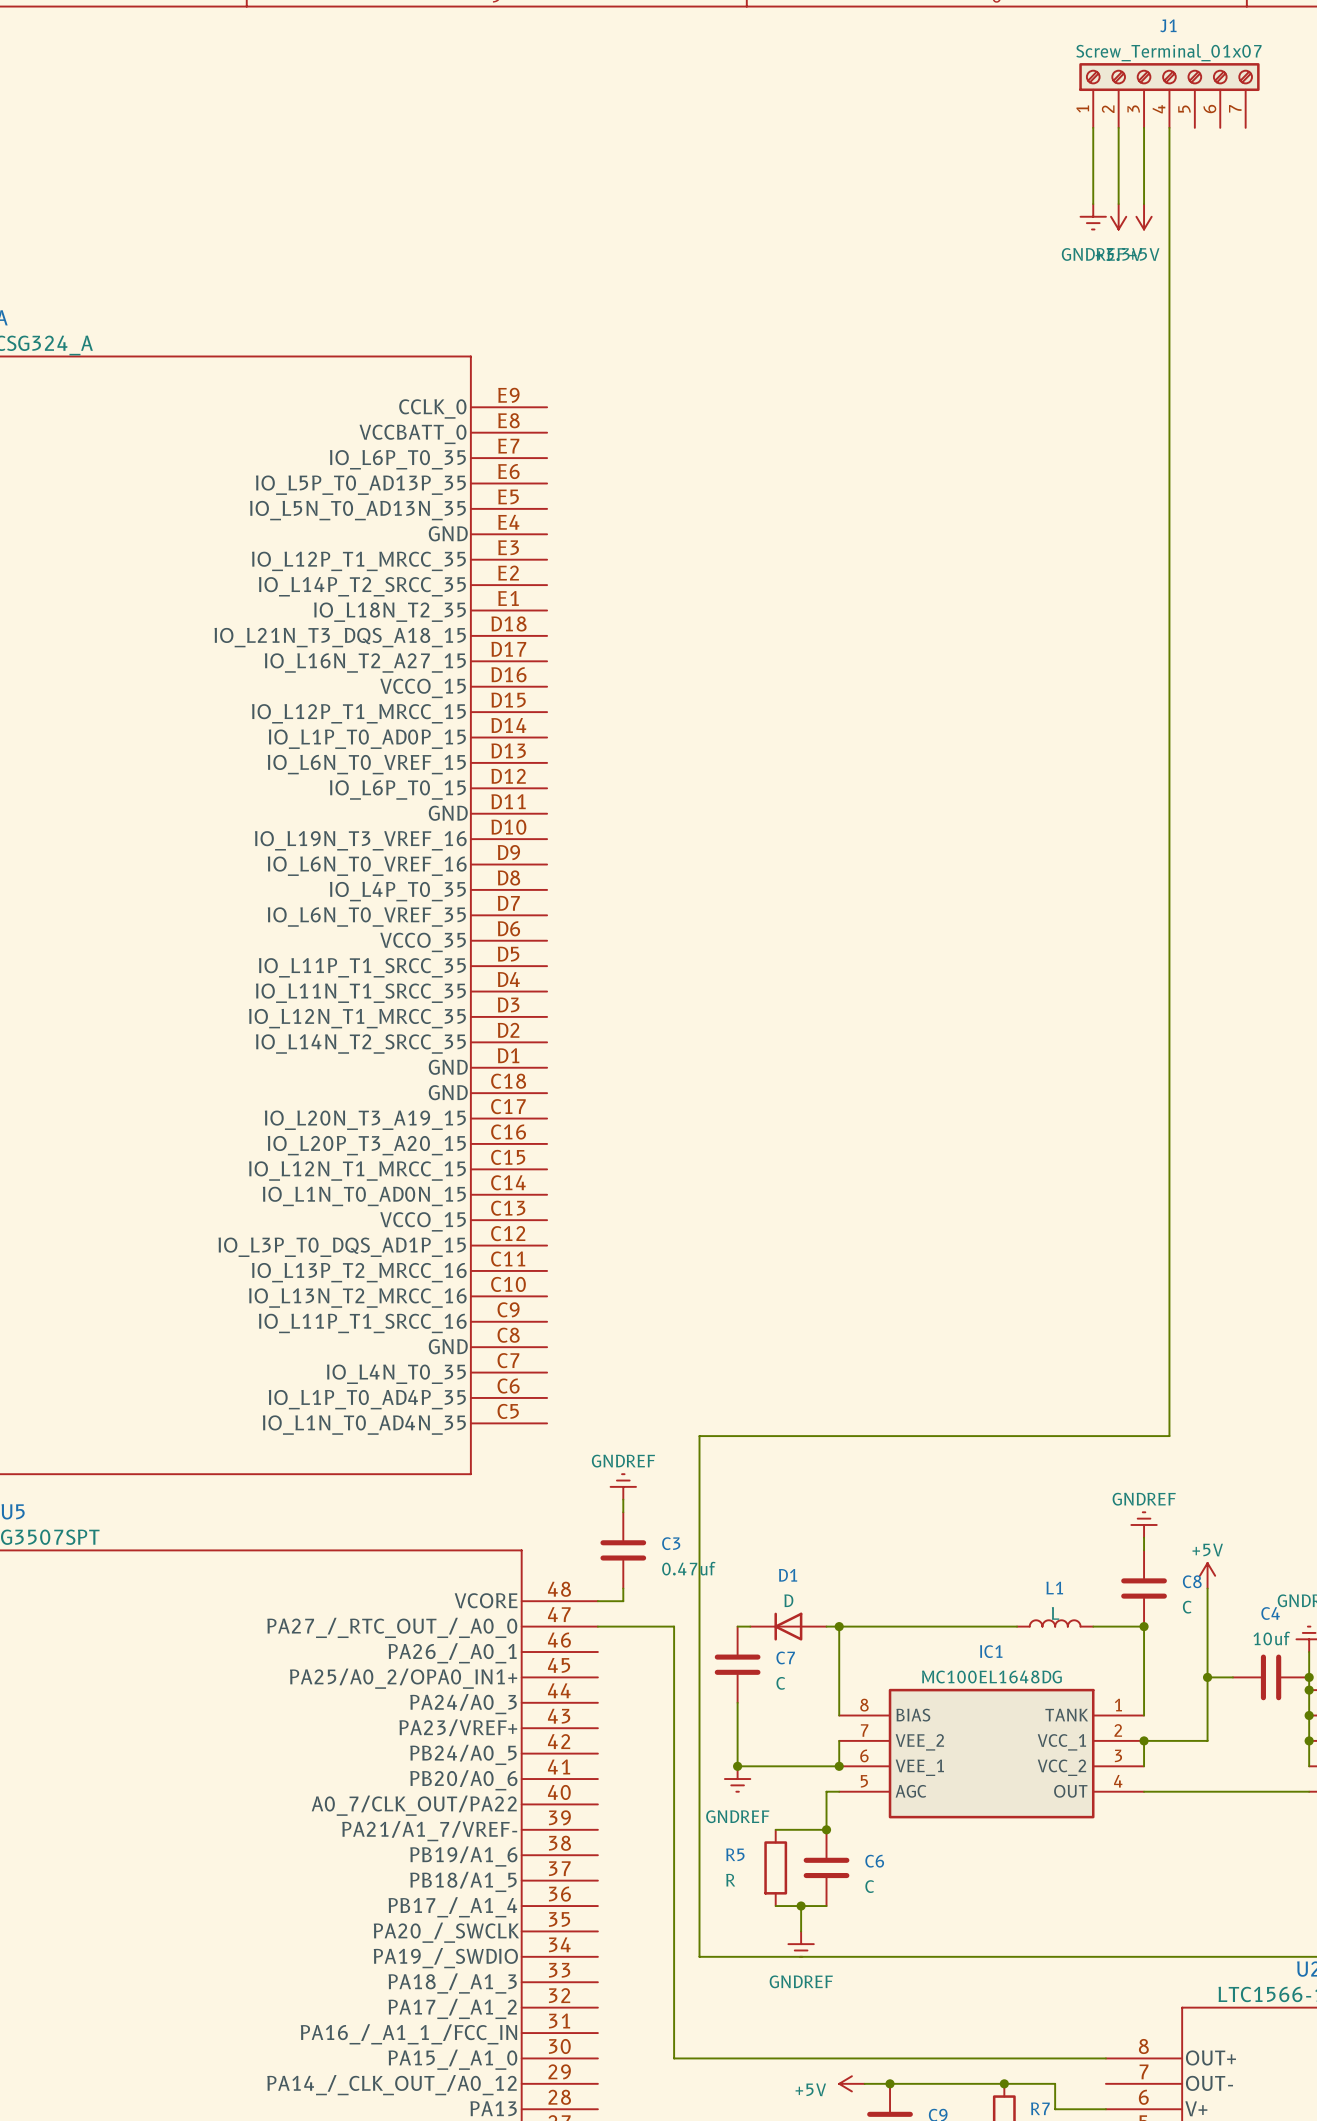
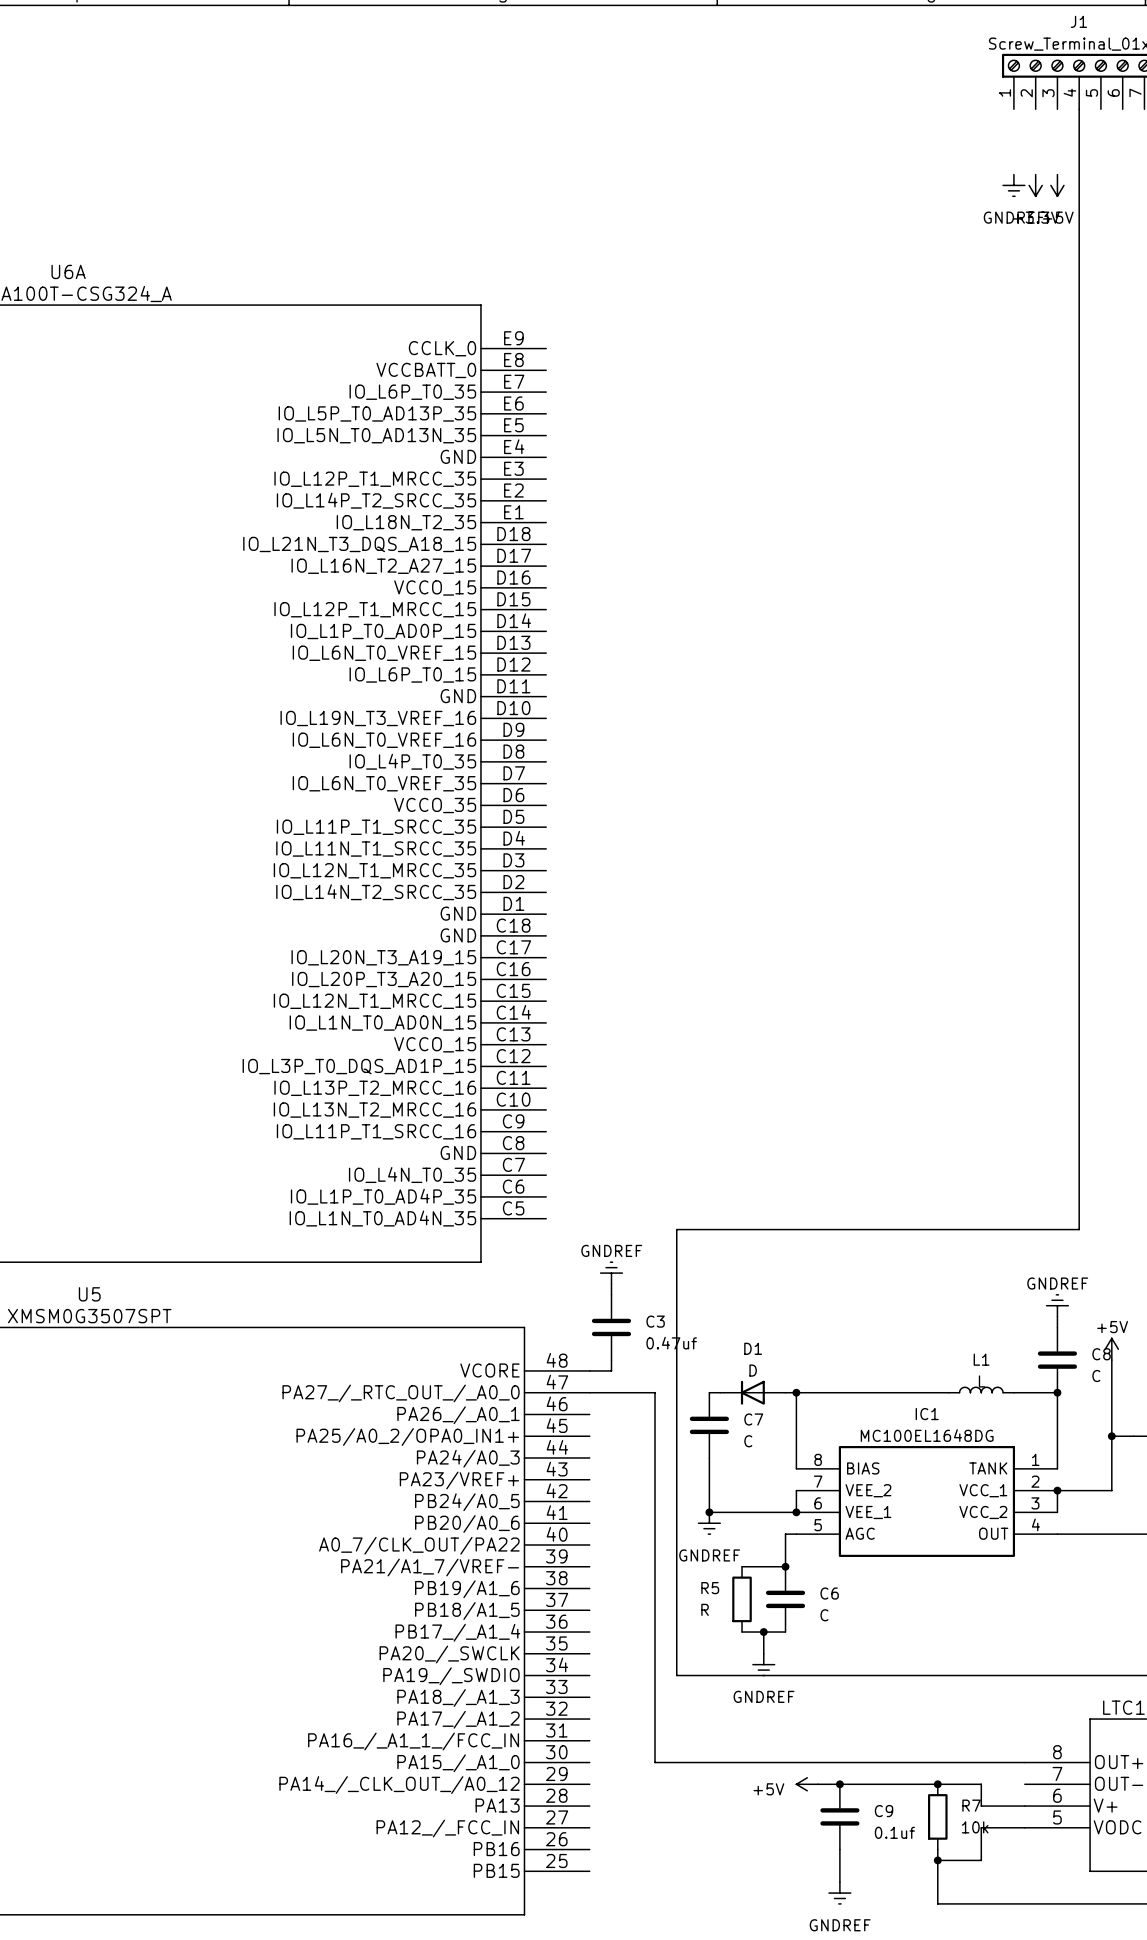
wire: (1093, 127) (1093, 204) -> none
wire: (1118, 127) (1118, 204) -> none
wire: (1144, 127) (1144, 204) -> none

